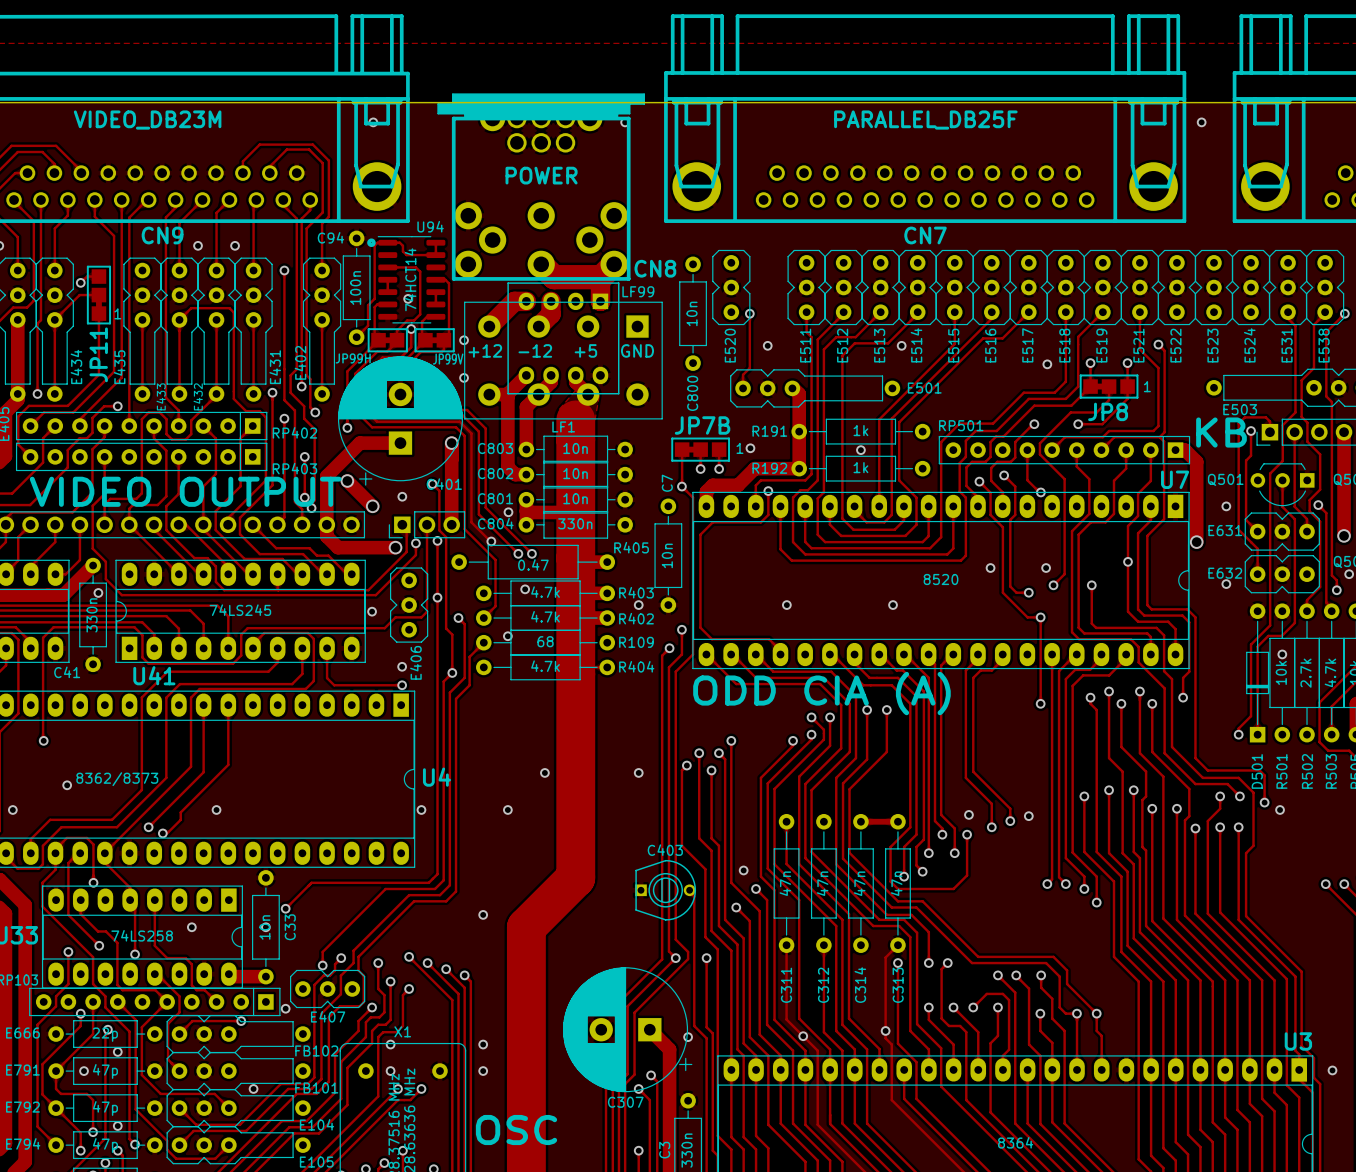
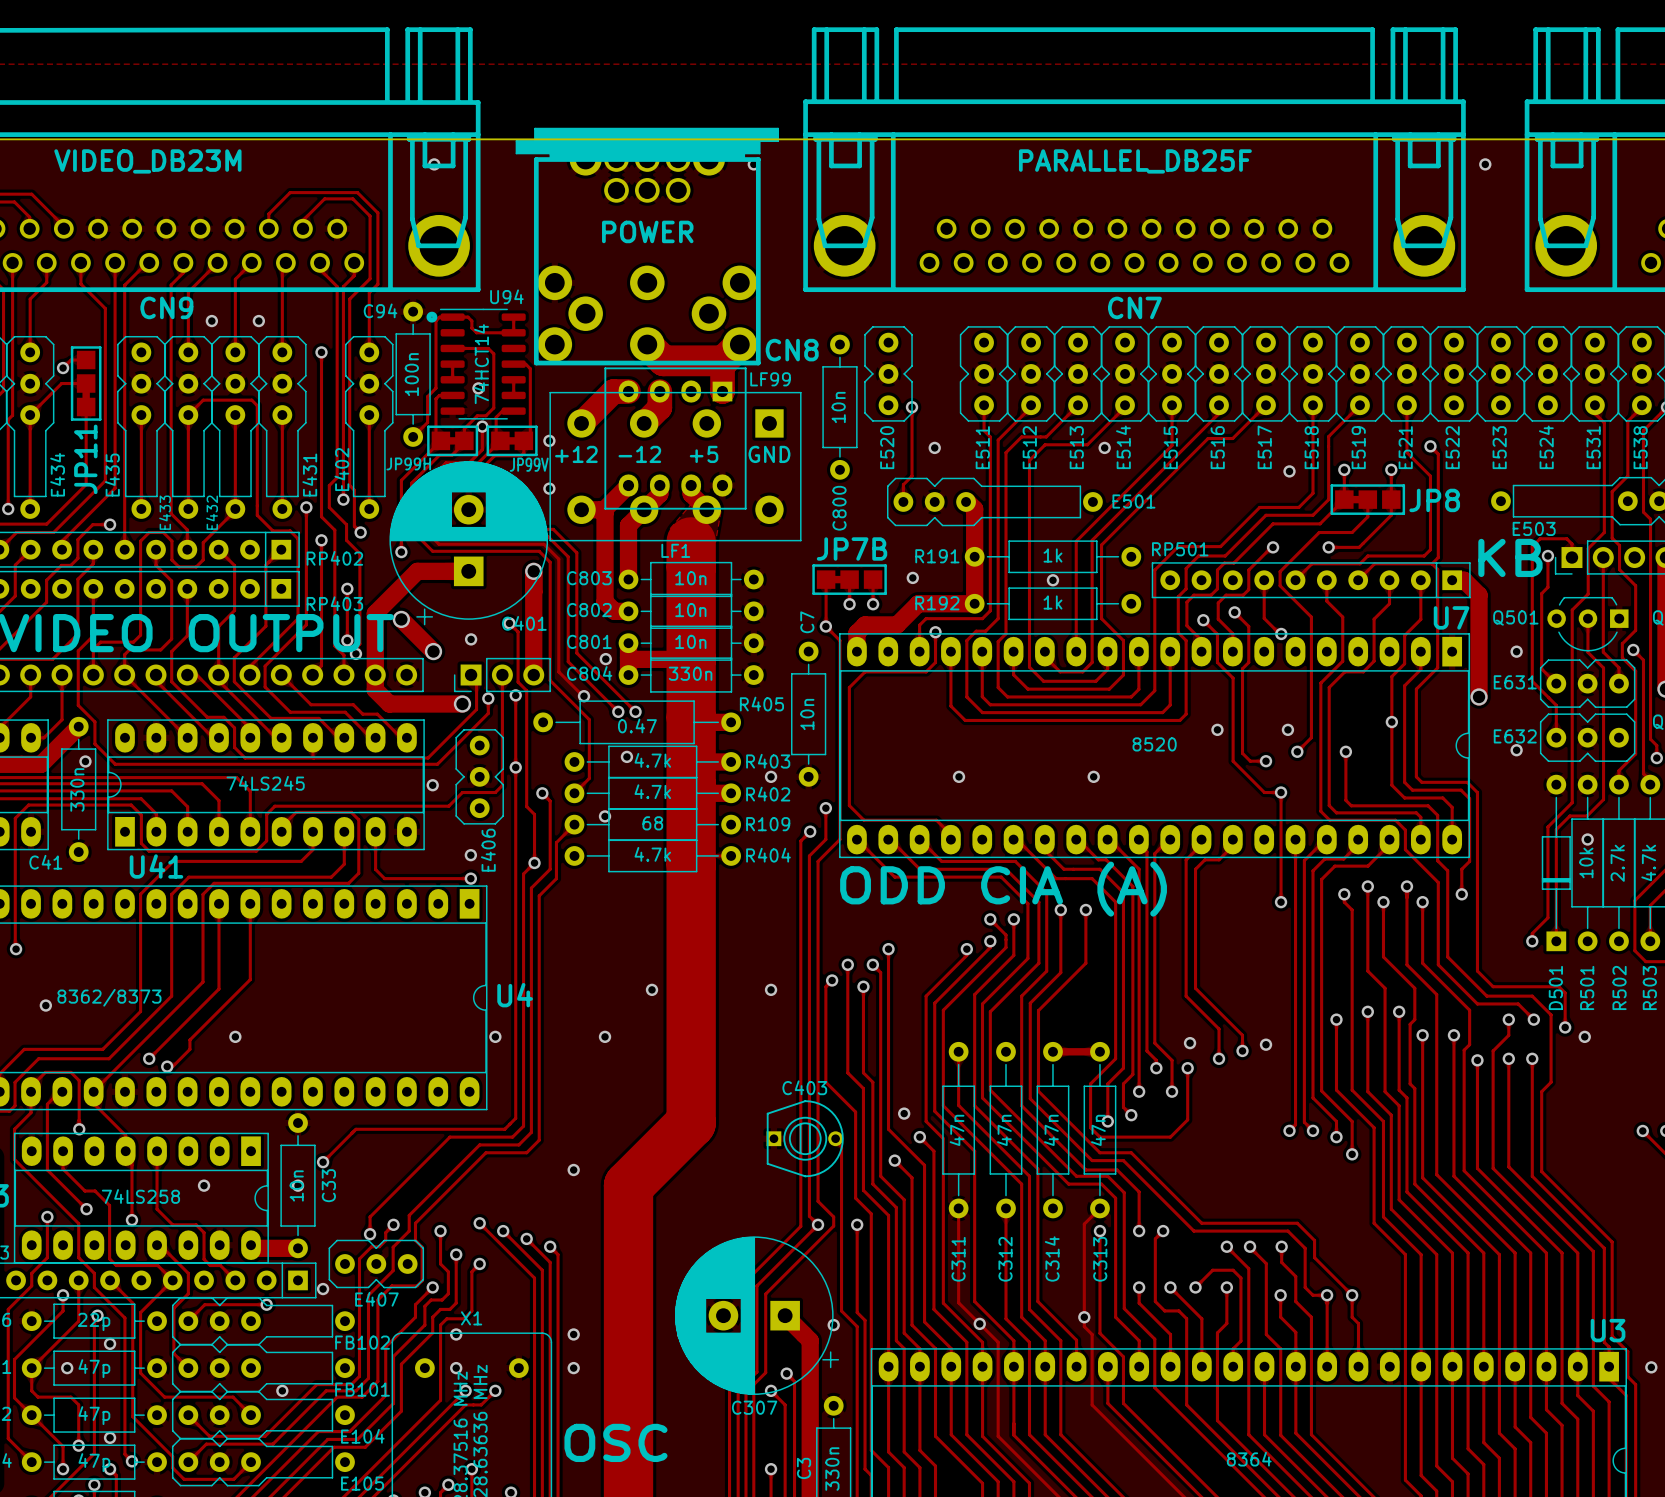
text: 1 (117, 313) -> none
text: 1 (1147, 386) -> none
JP8 name position: JP8 (1108, 411) -> JP8 (1434, 500)
text: 1 (739, 448) -> none

